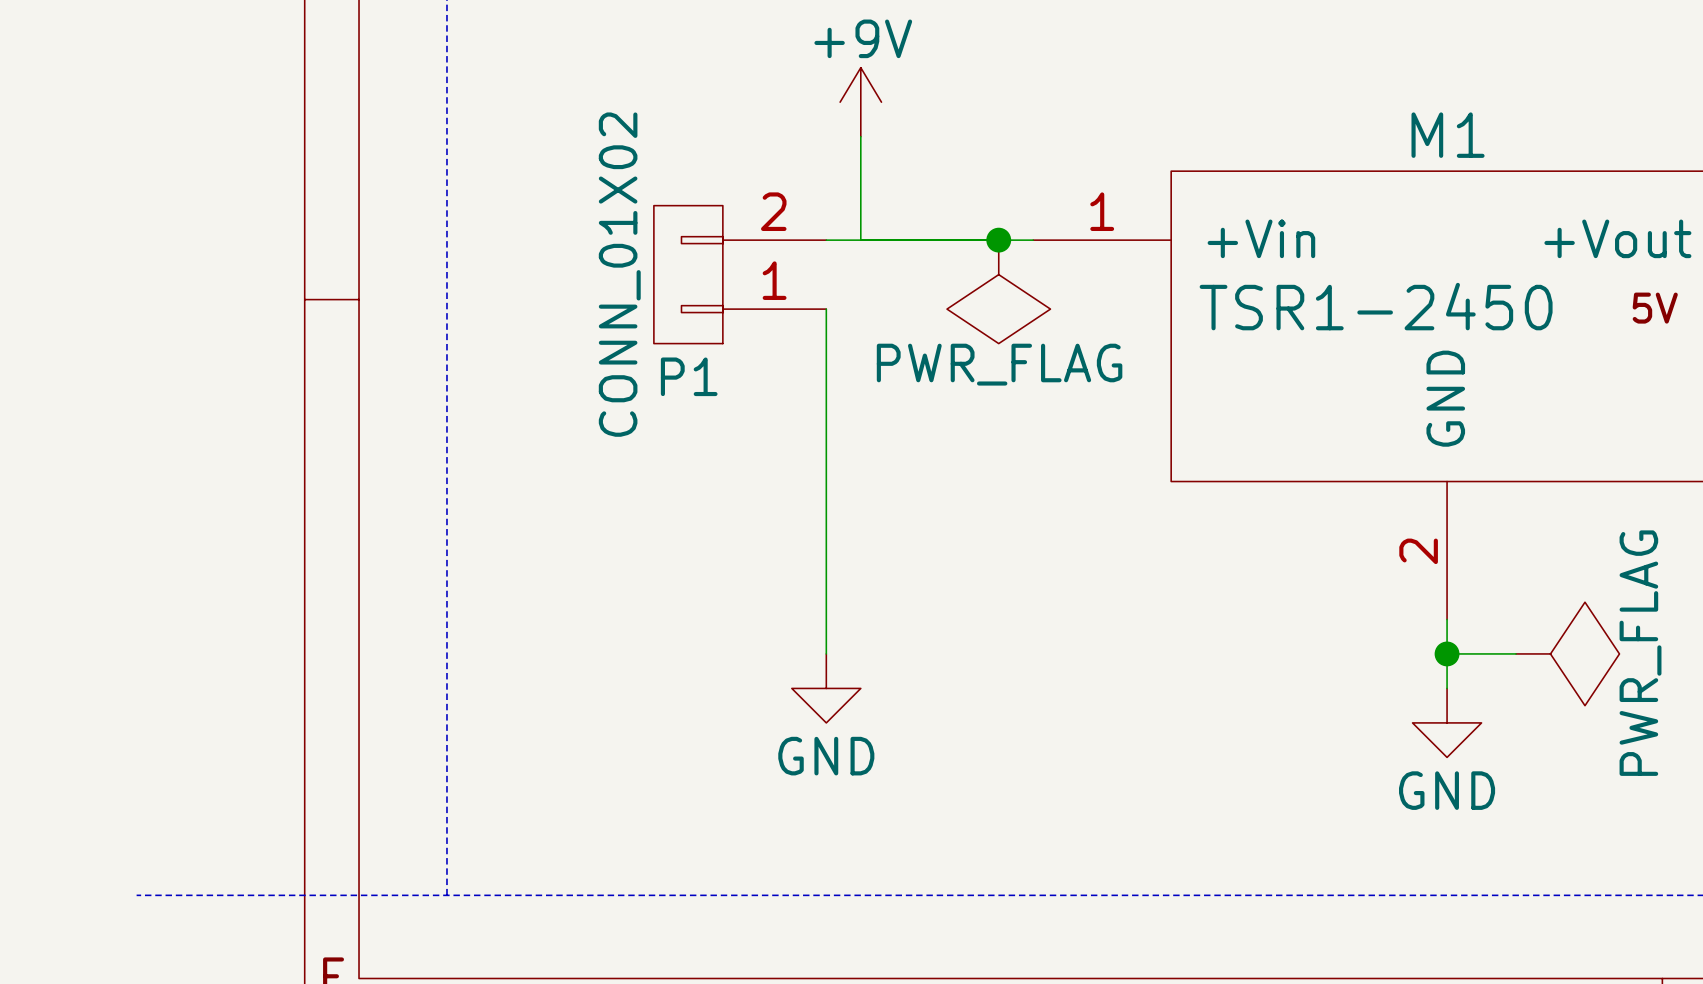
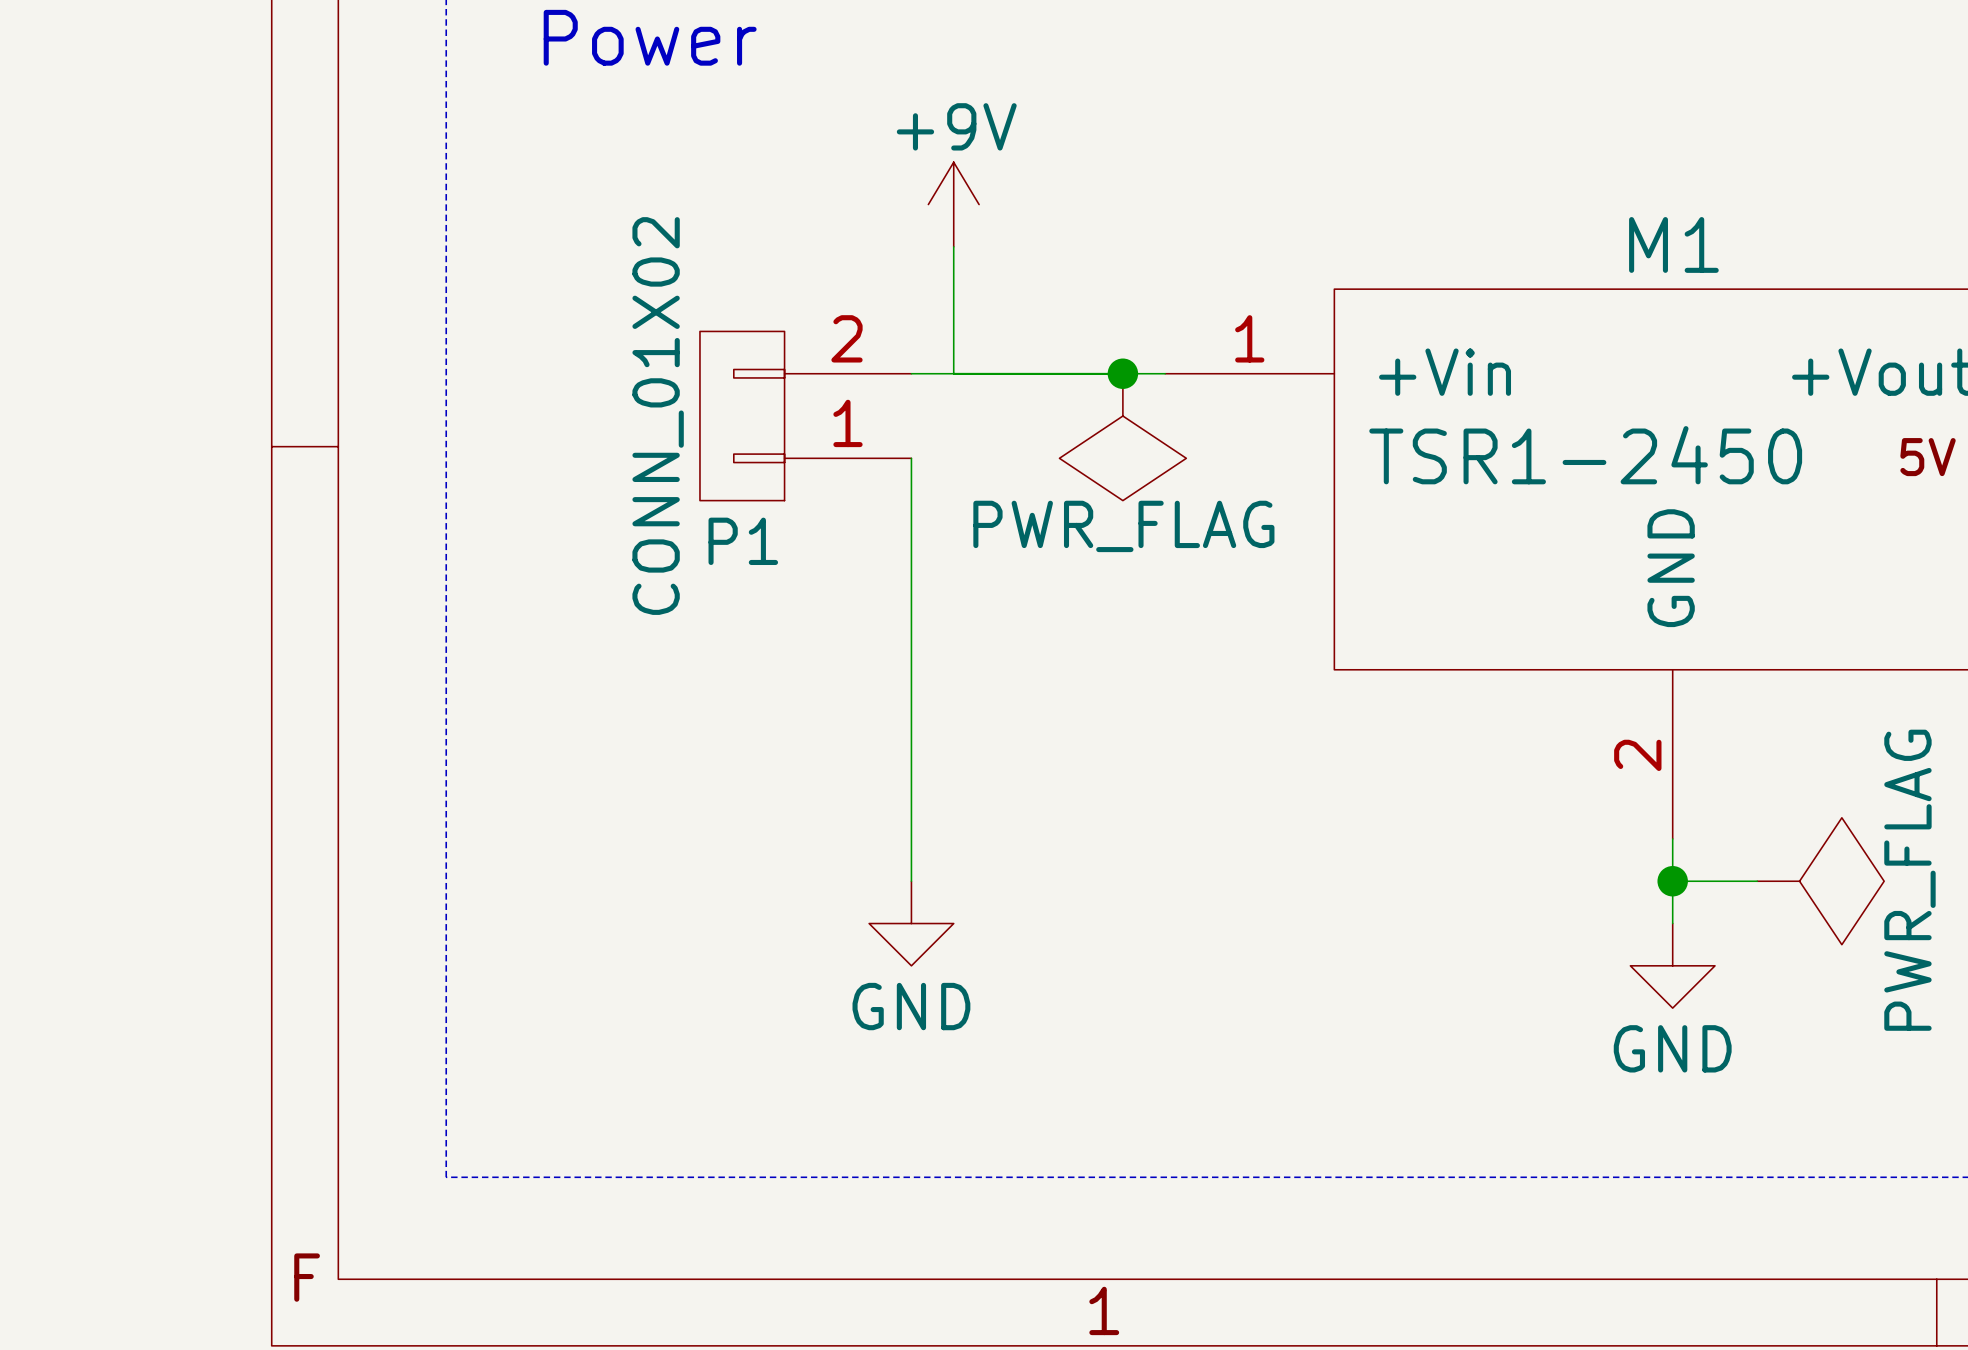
line: (136, 895) (446, 895) -> none

